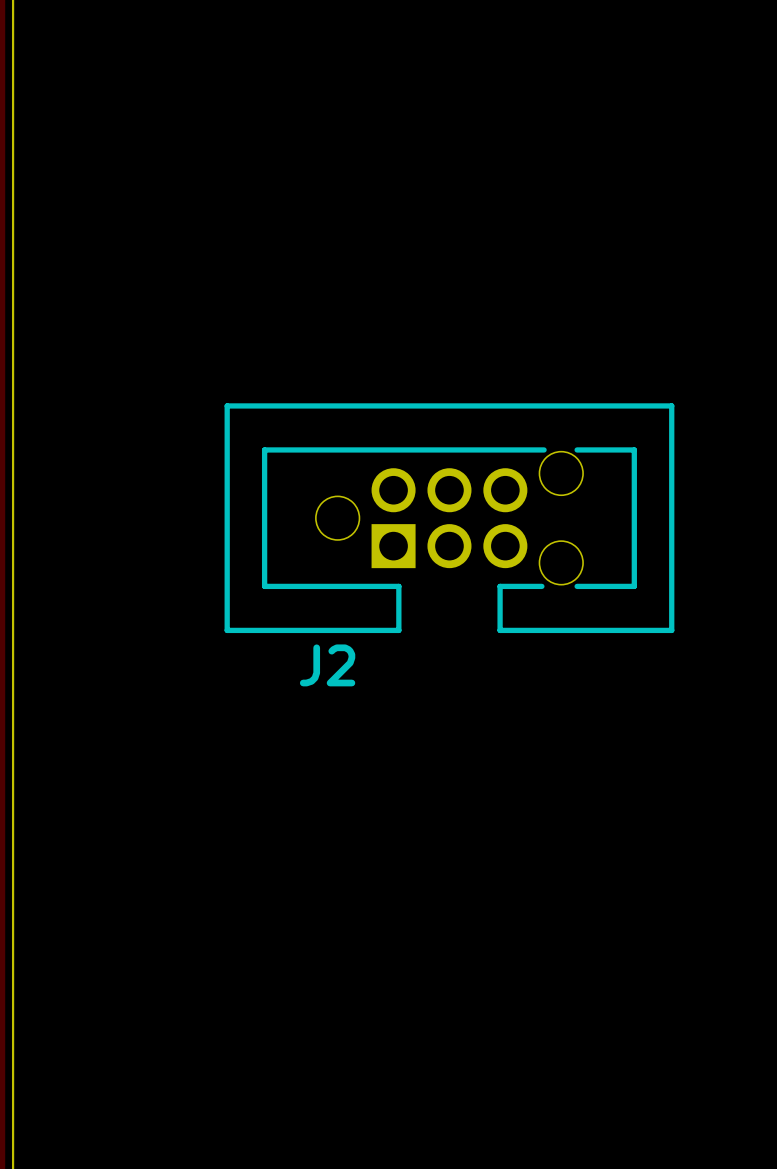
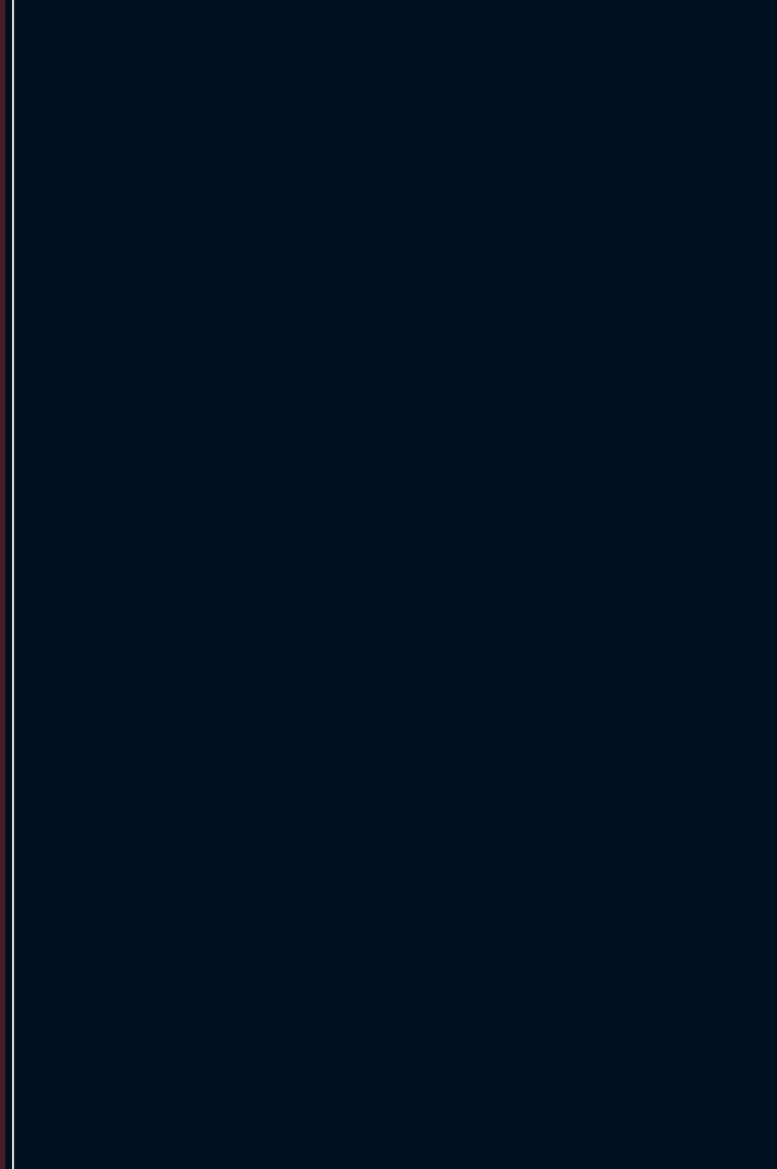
J2: (449, 518) -> none

